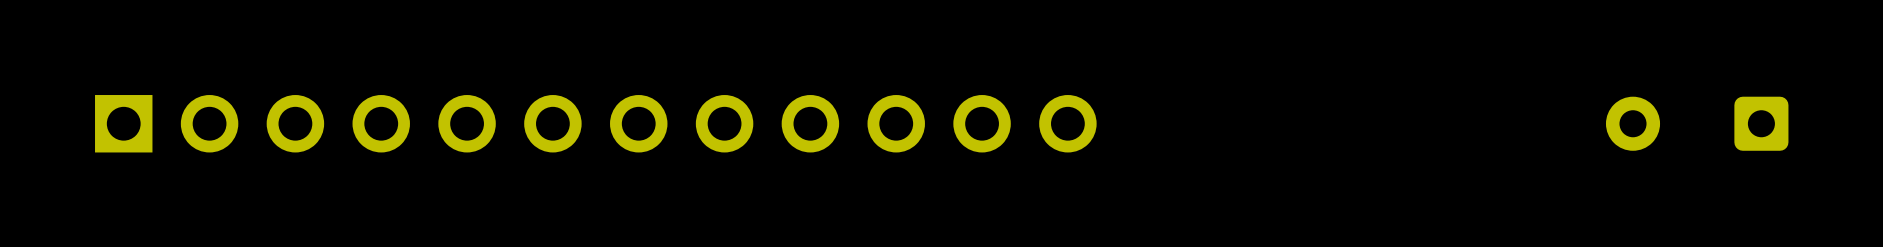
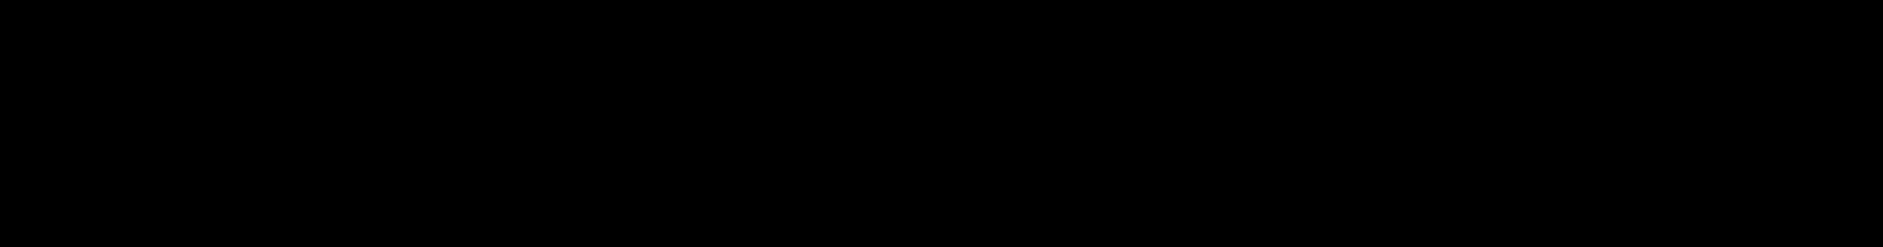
part: (595, 123) -> none
part: (1697, 123) -> none

